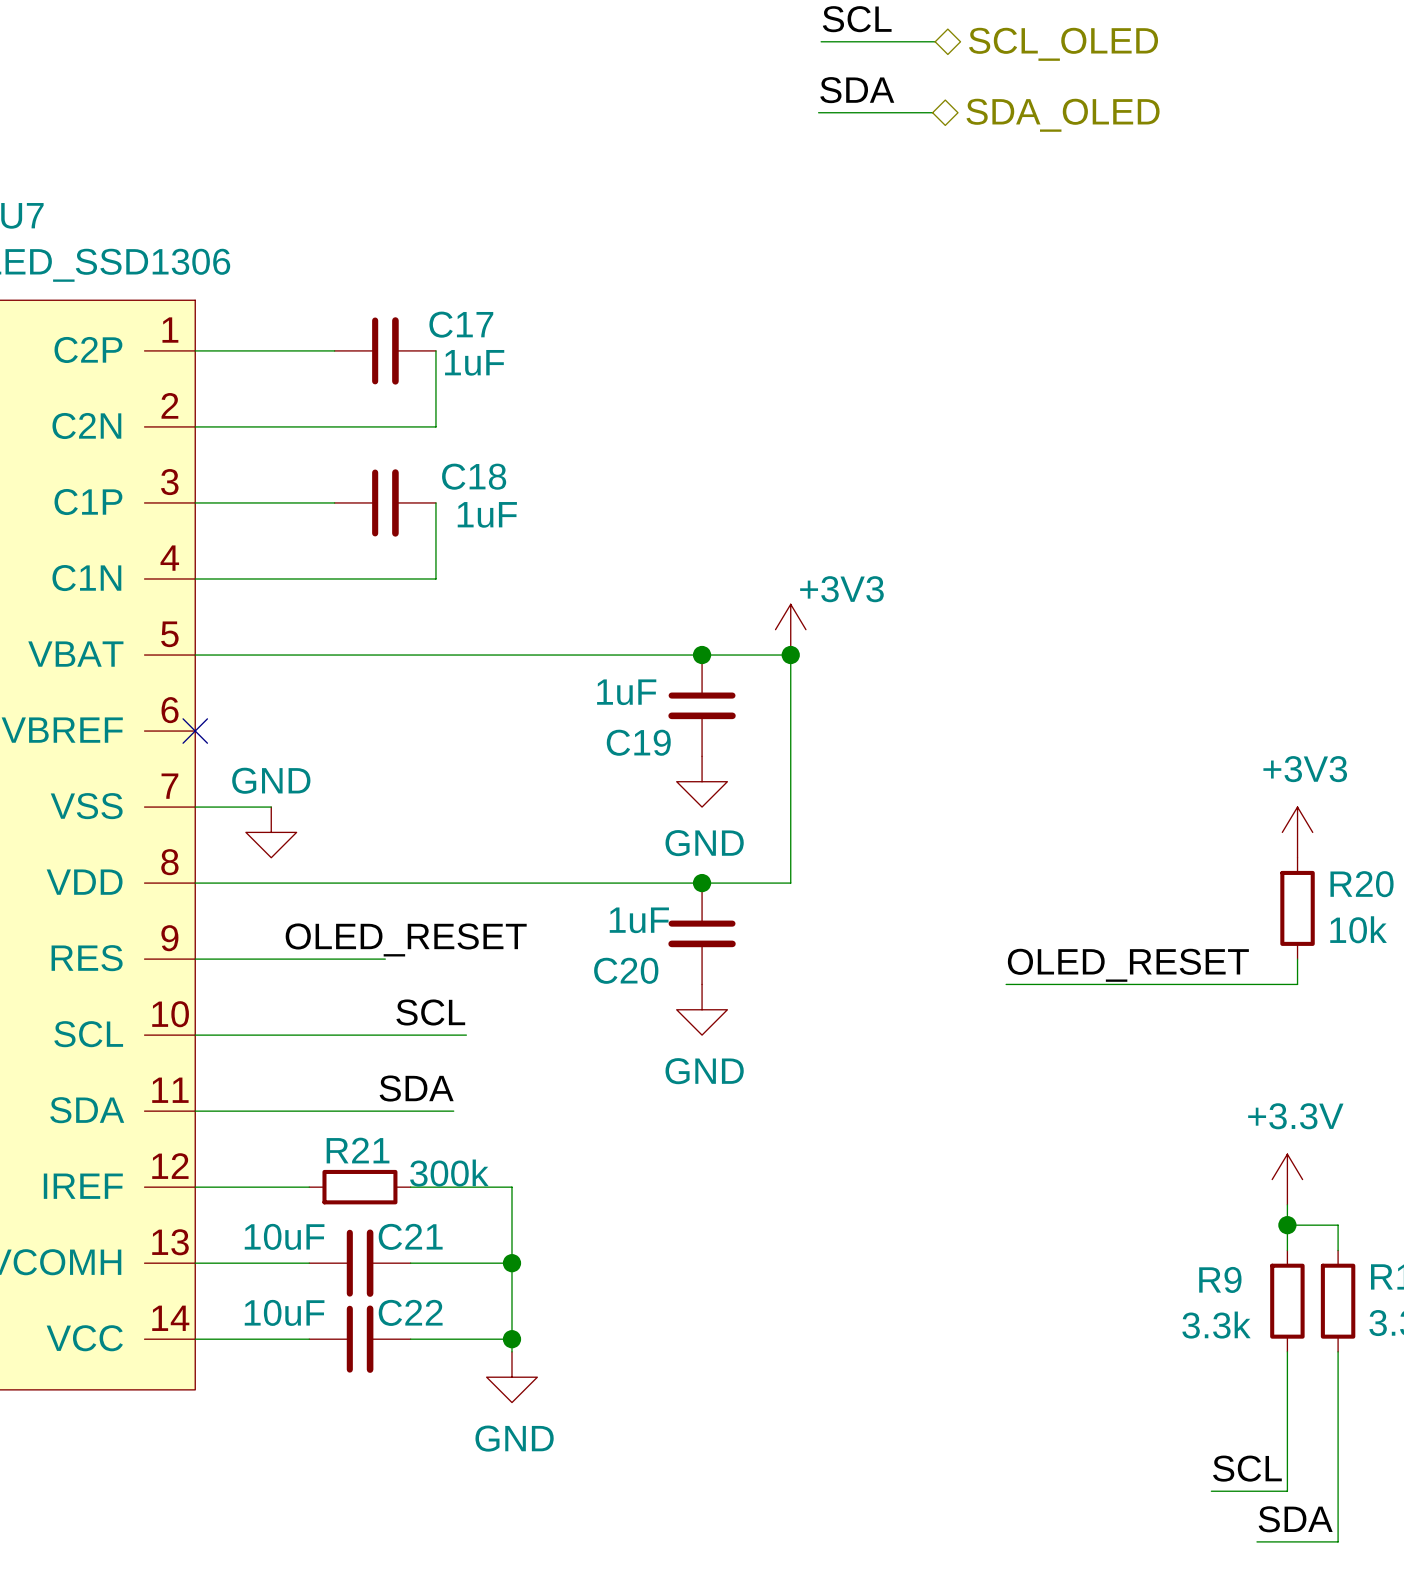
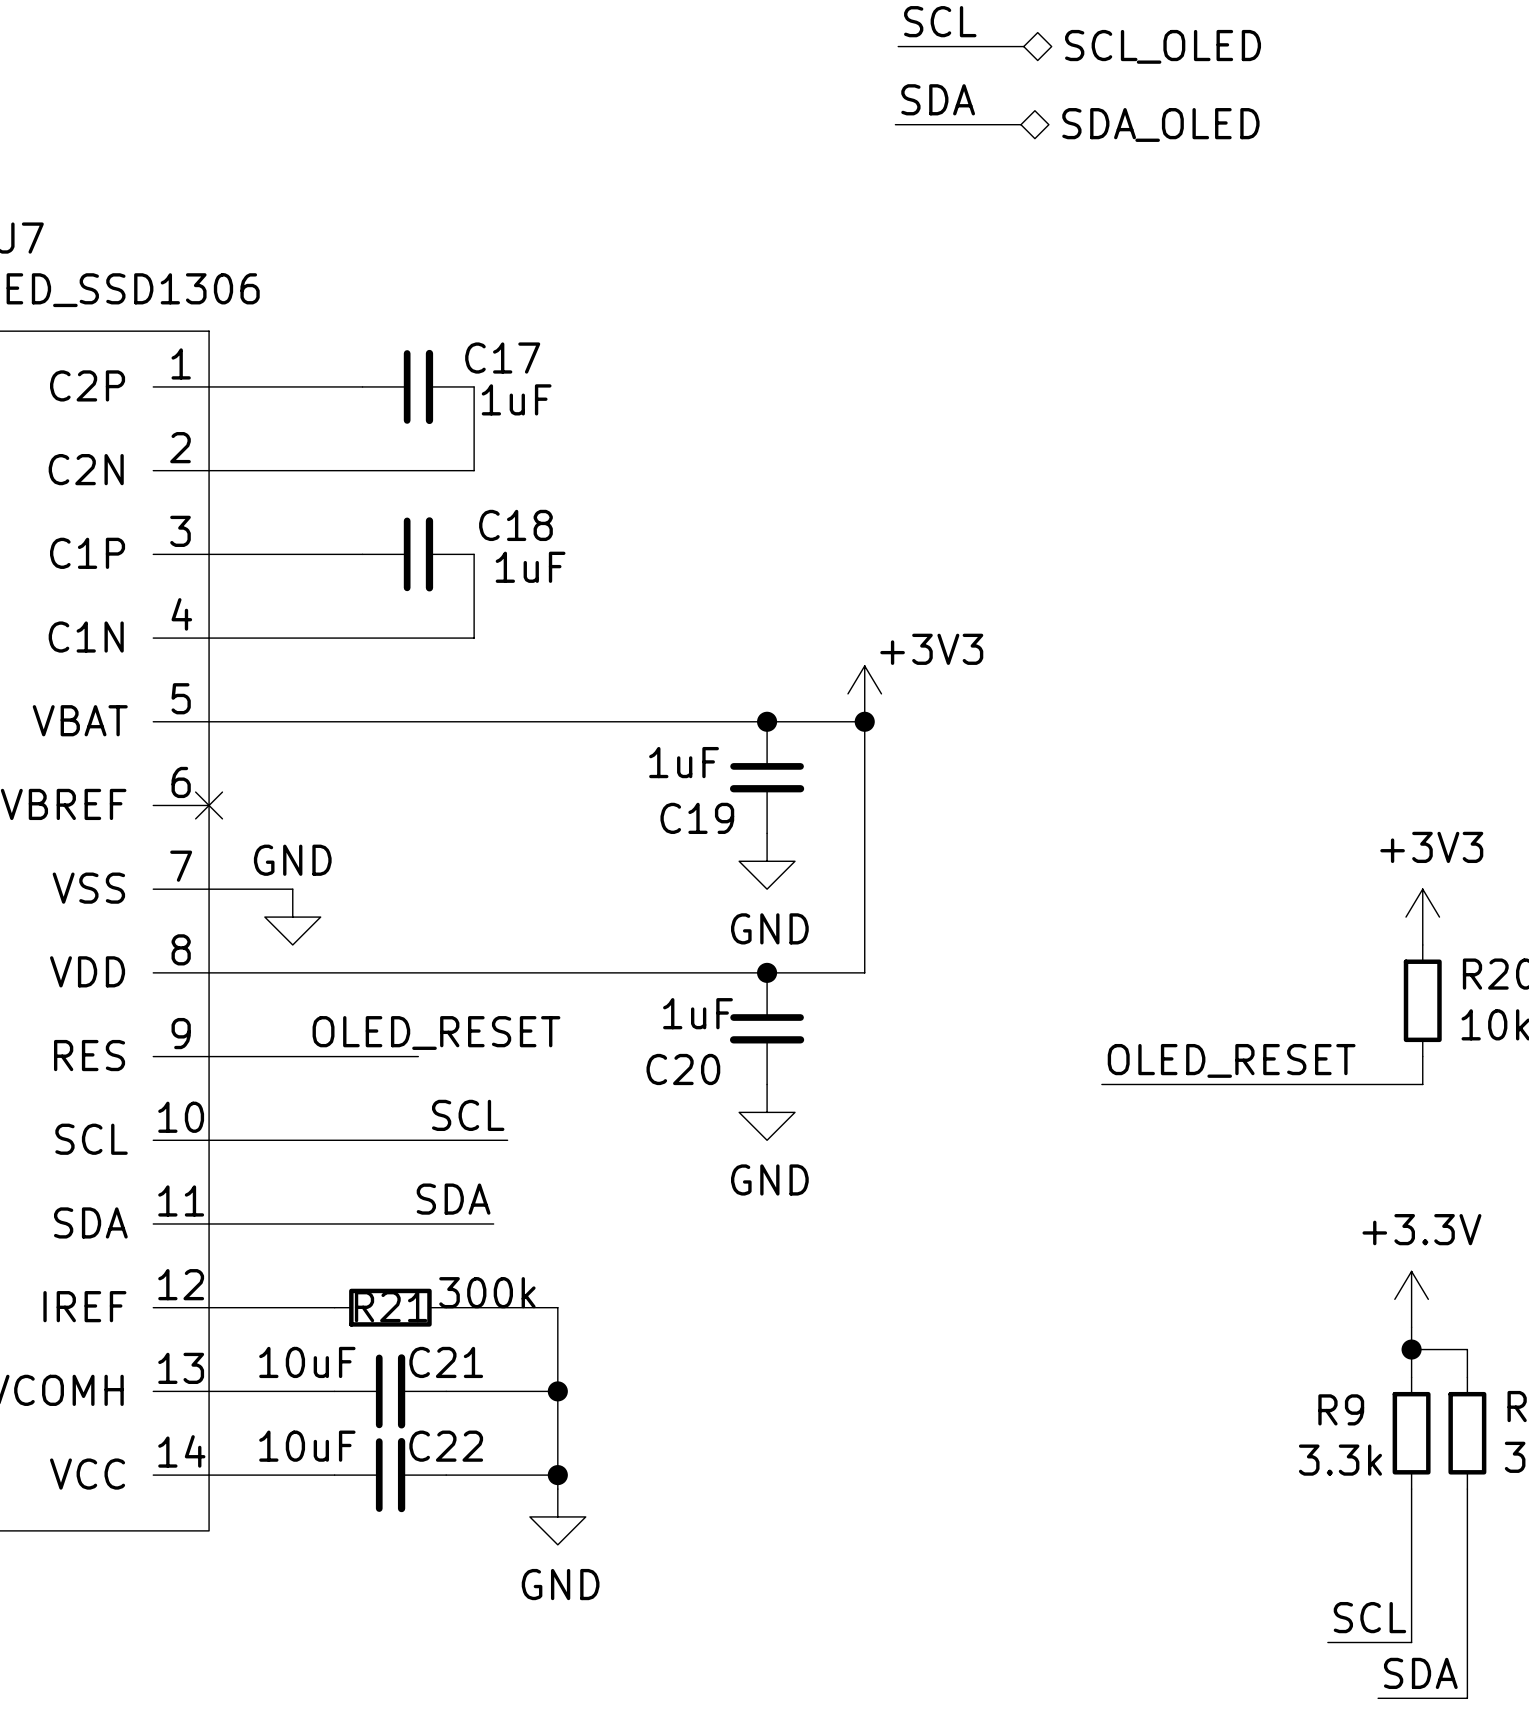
R21 name position: R21 (358, 1150) -> R21 (391, 1306)

